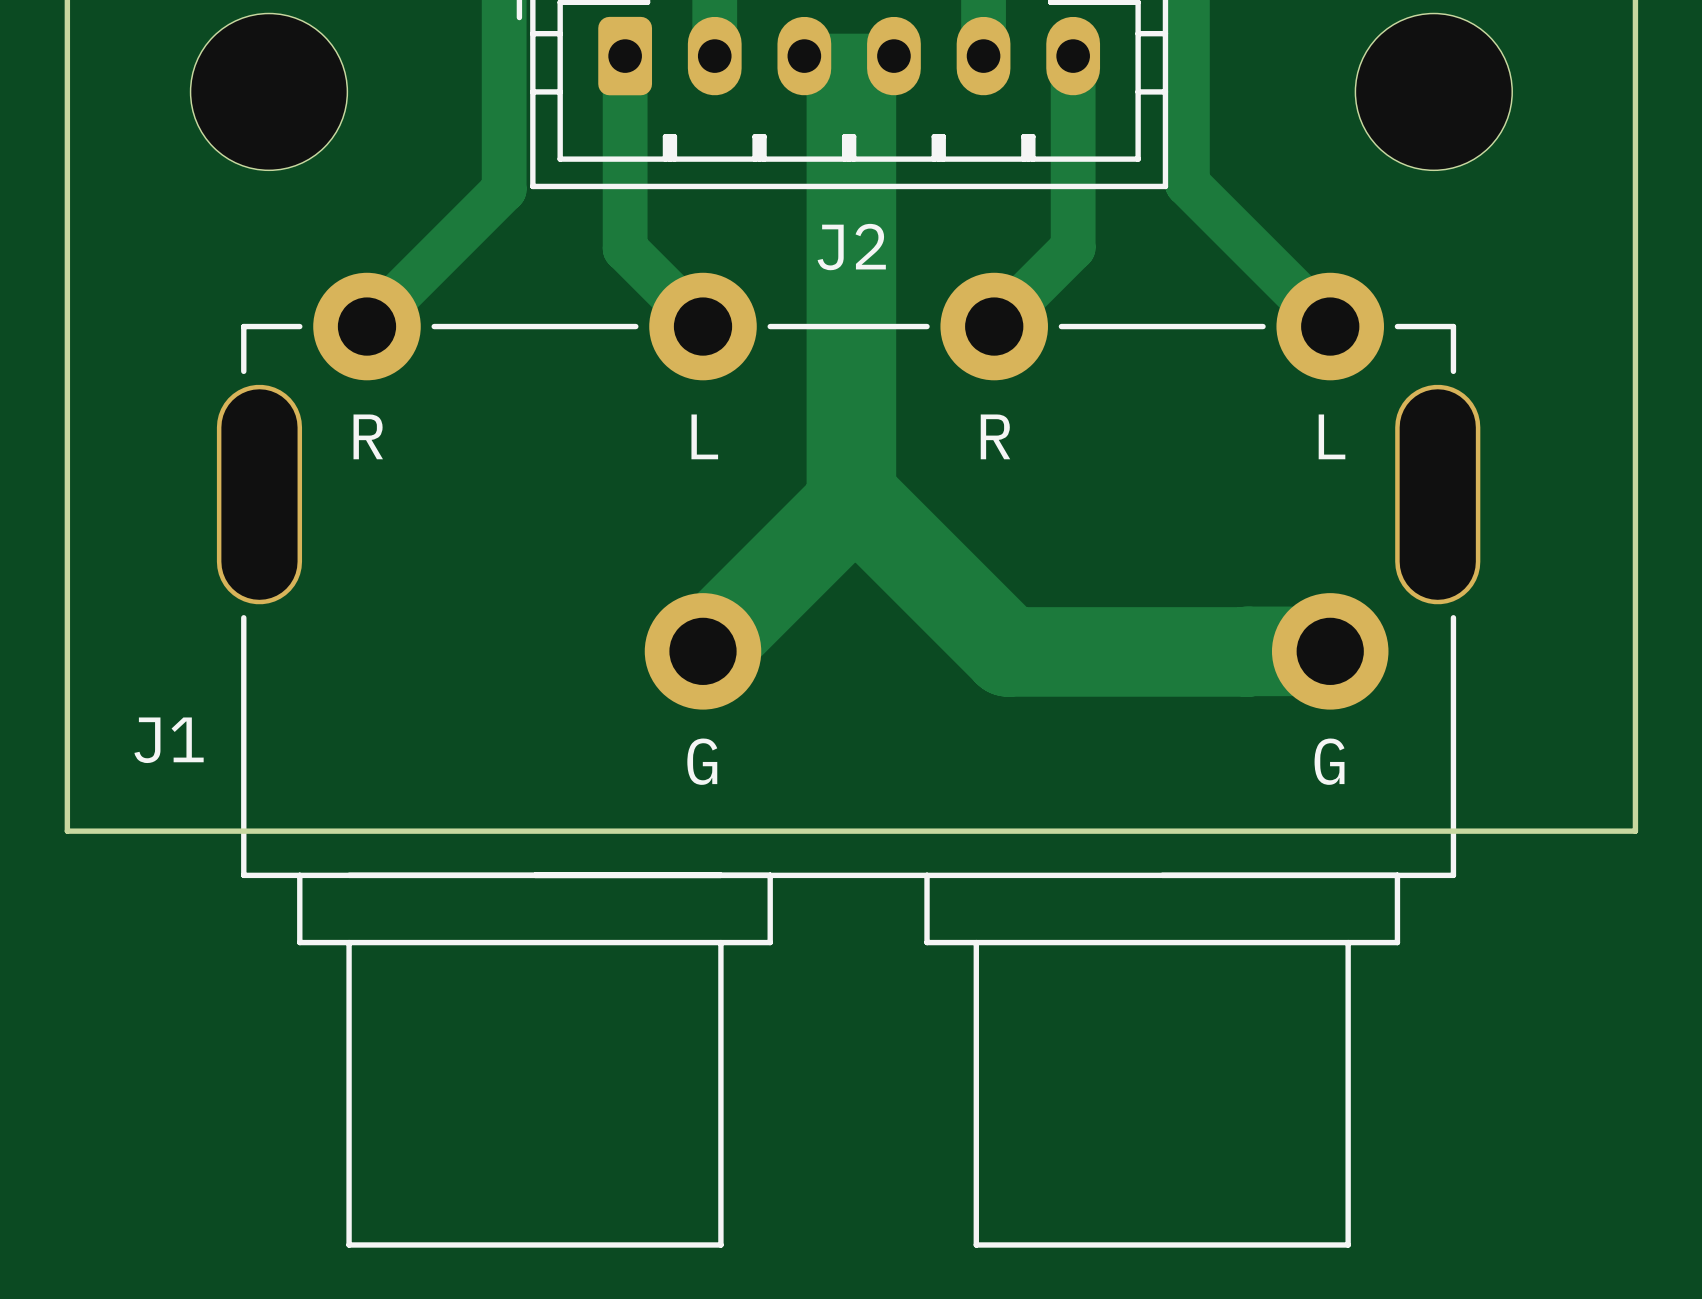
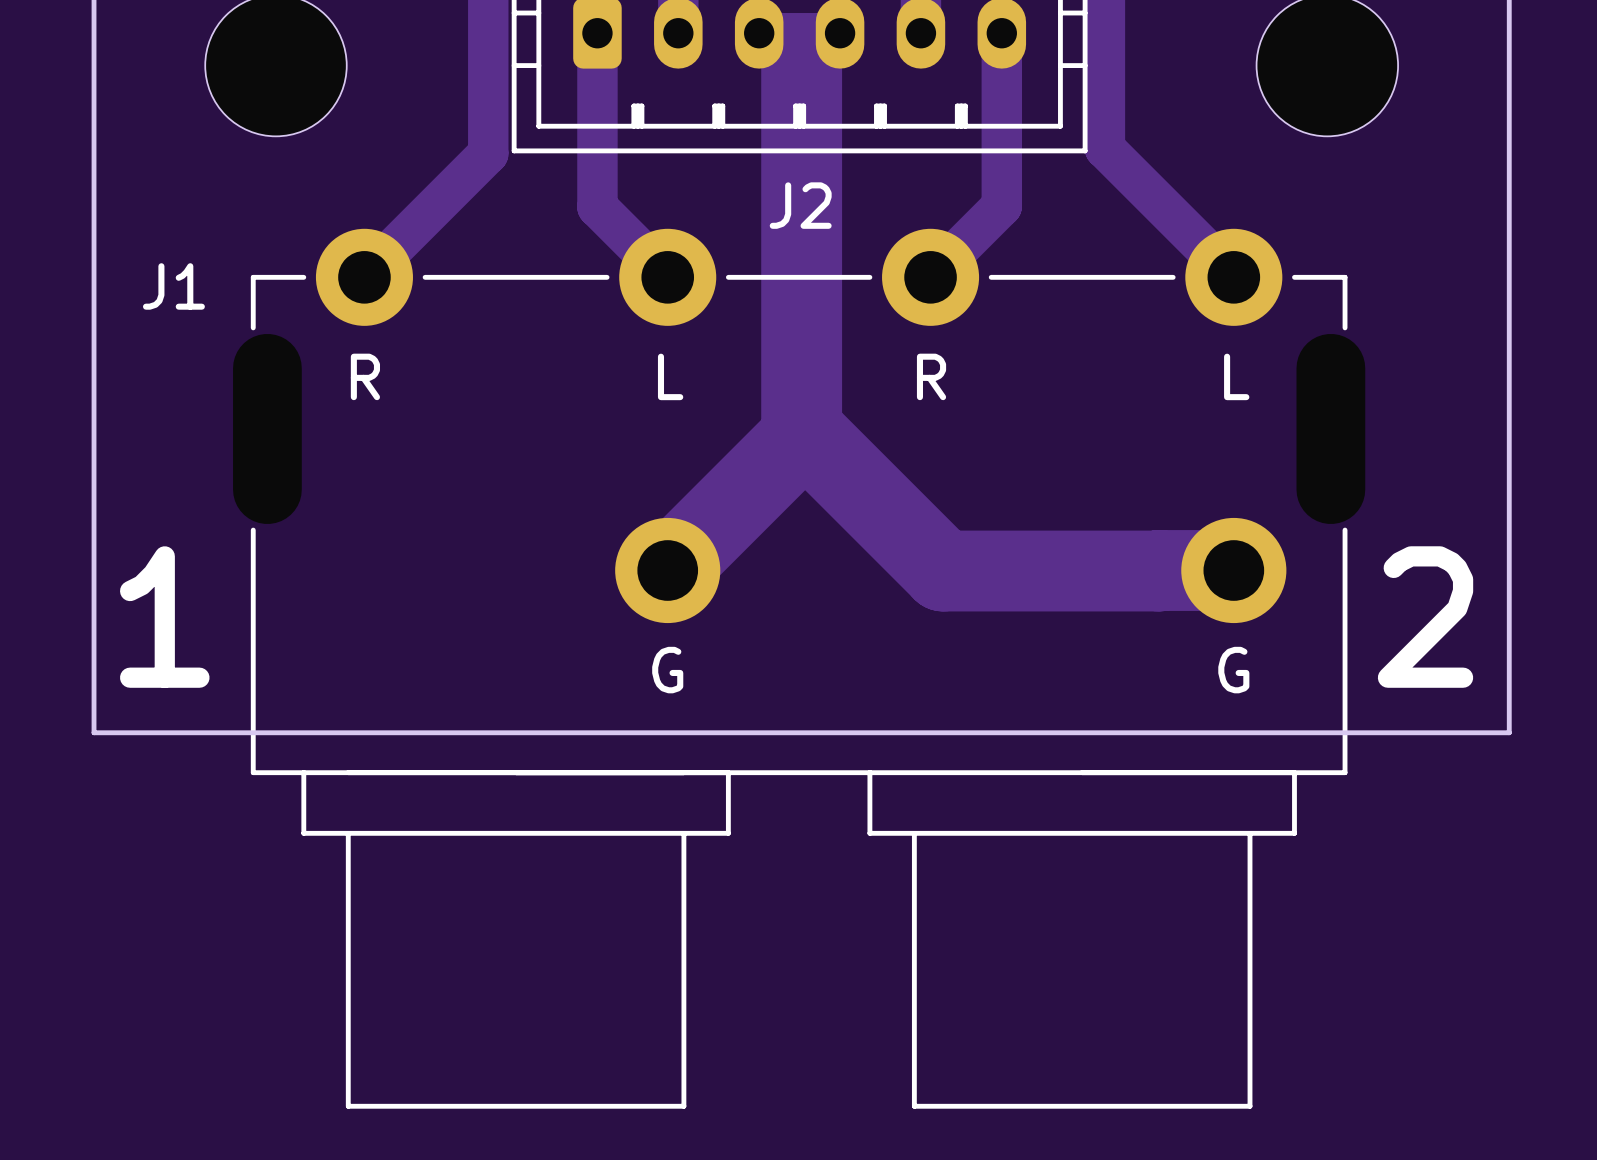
J1 footprint: [216, 272, 1481, 1248] -> [233, 228, 1366, 1109]
text: none -> 2 (1425, 617)
text: none -> 1 (164, 617)
J1 name position: J1 (169, 740) -> J1 (173, 286)

